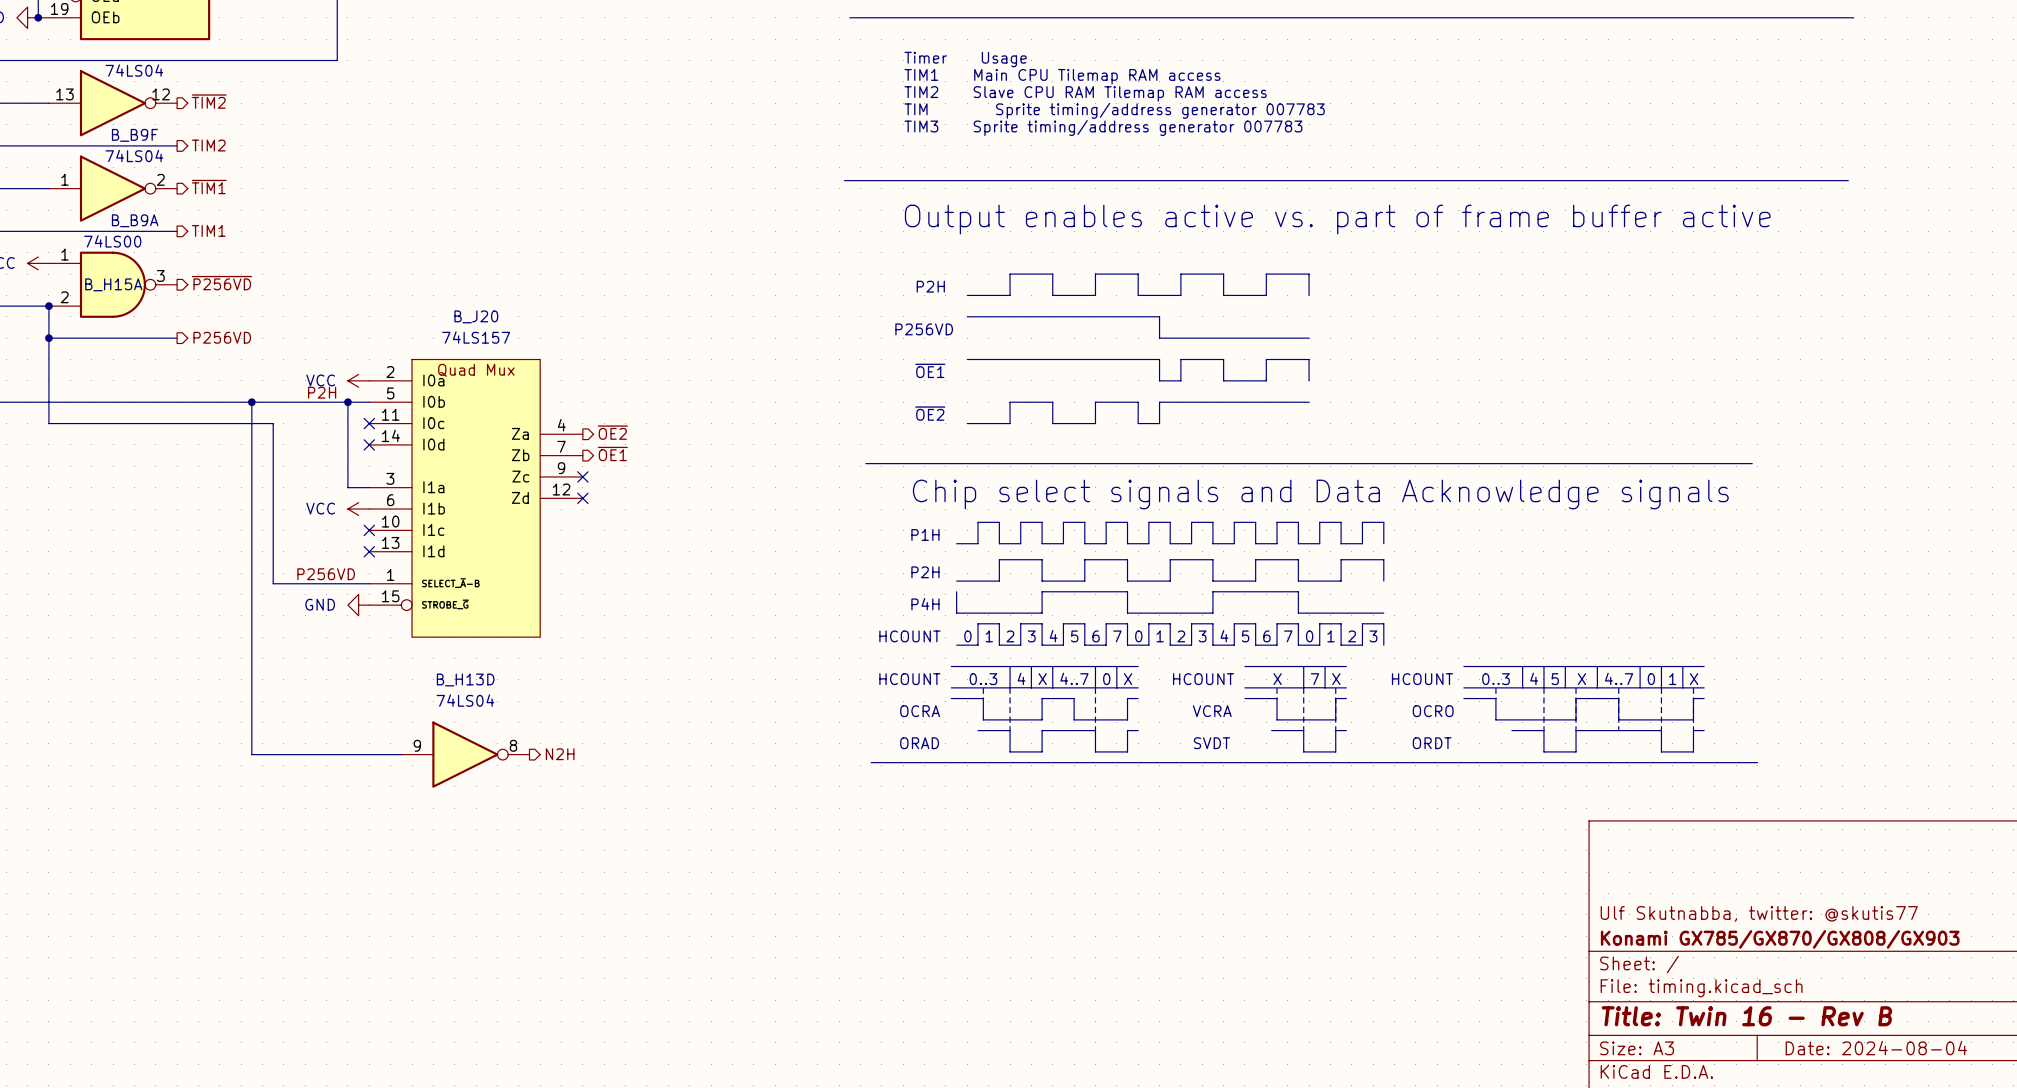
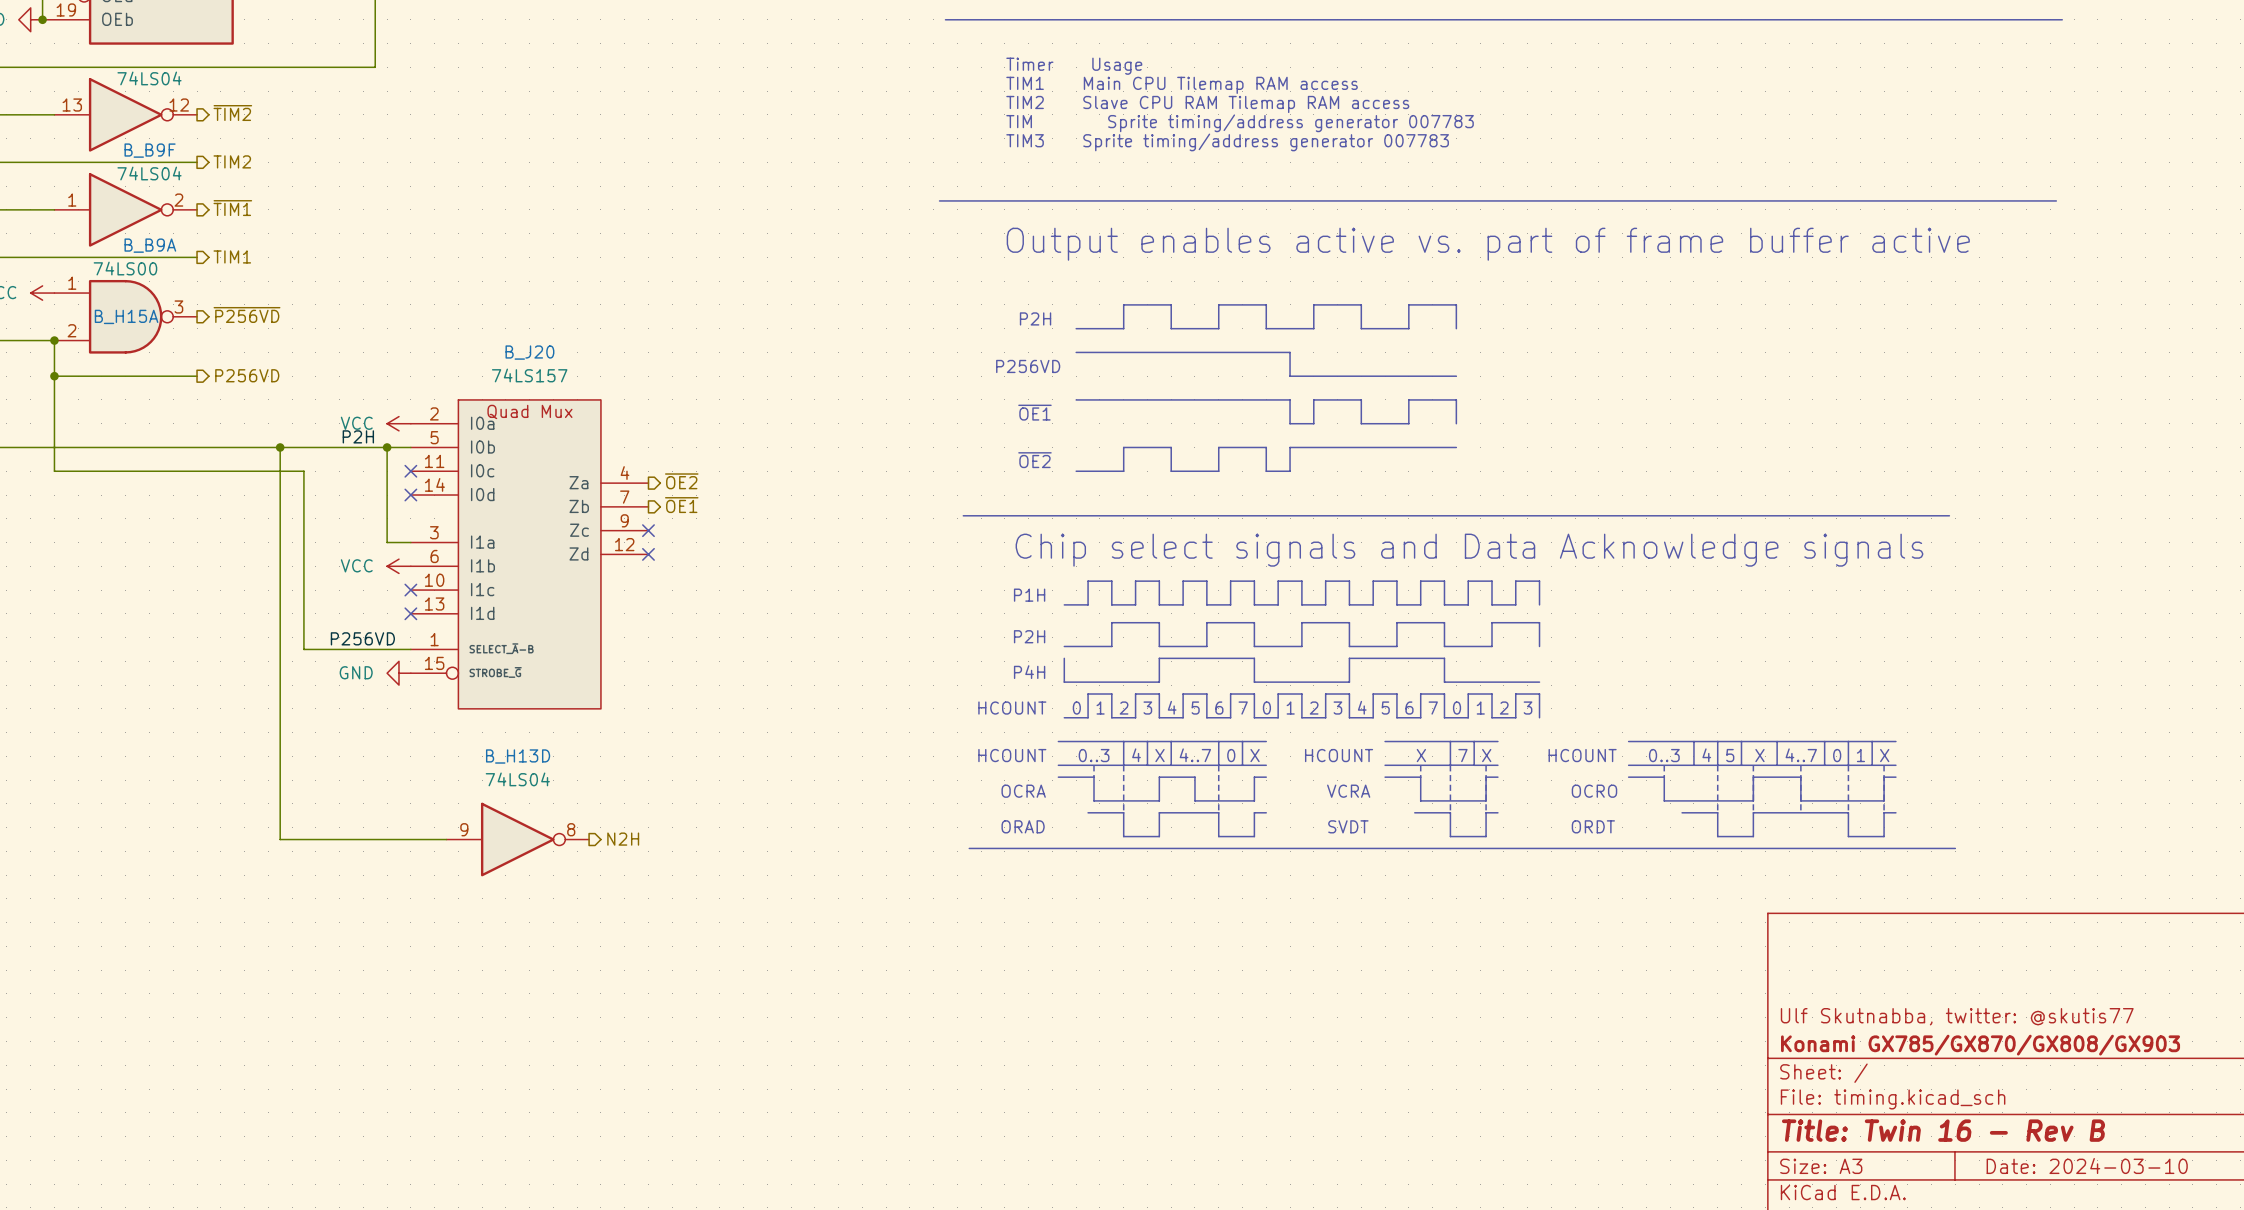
title block: Date: 2024-08-04 (1876, 1048) -> Date: 2024-03-10 (2087, 1166)

